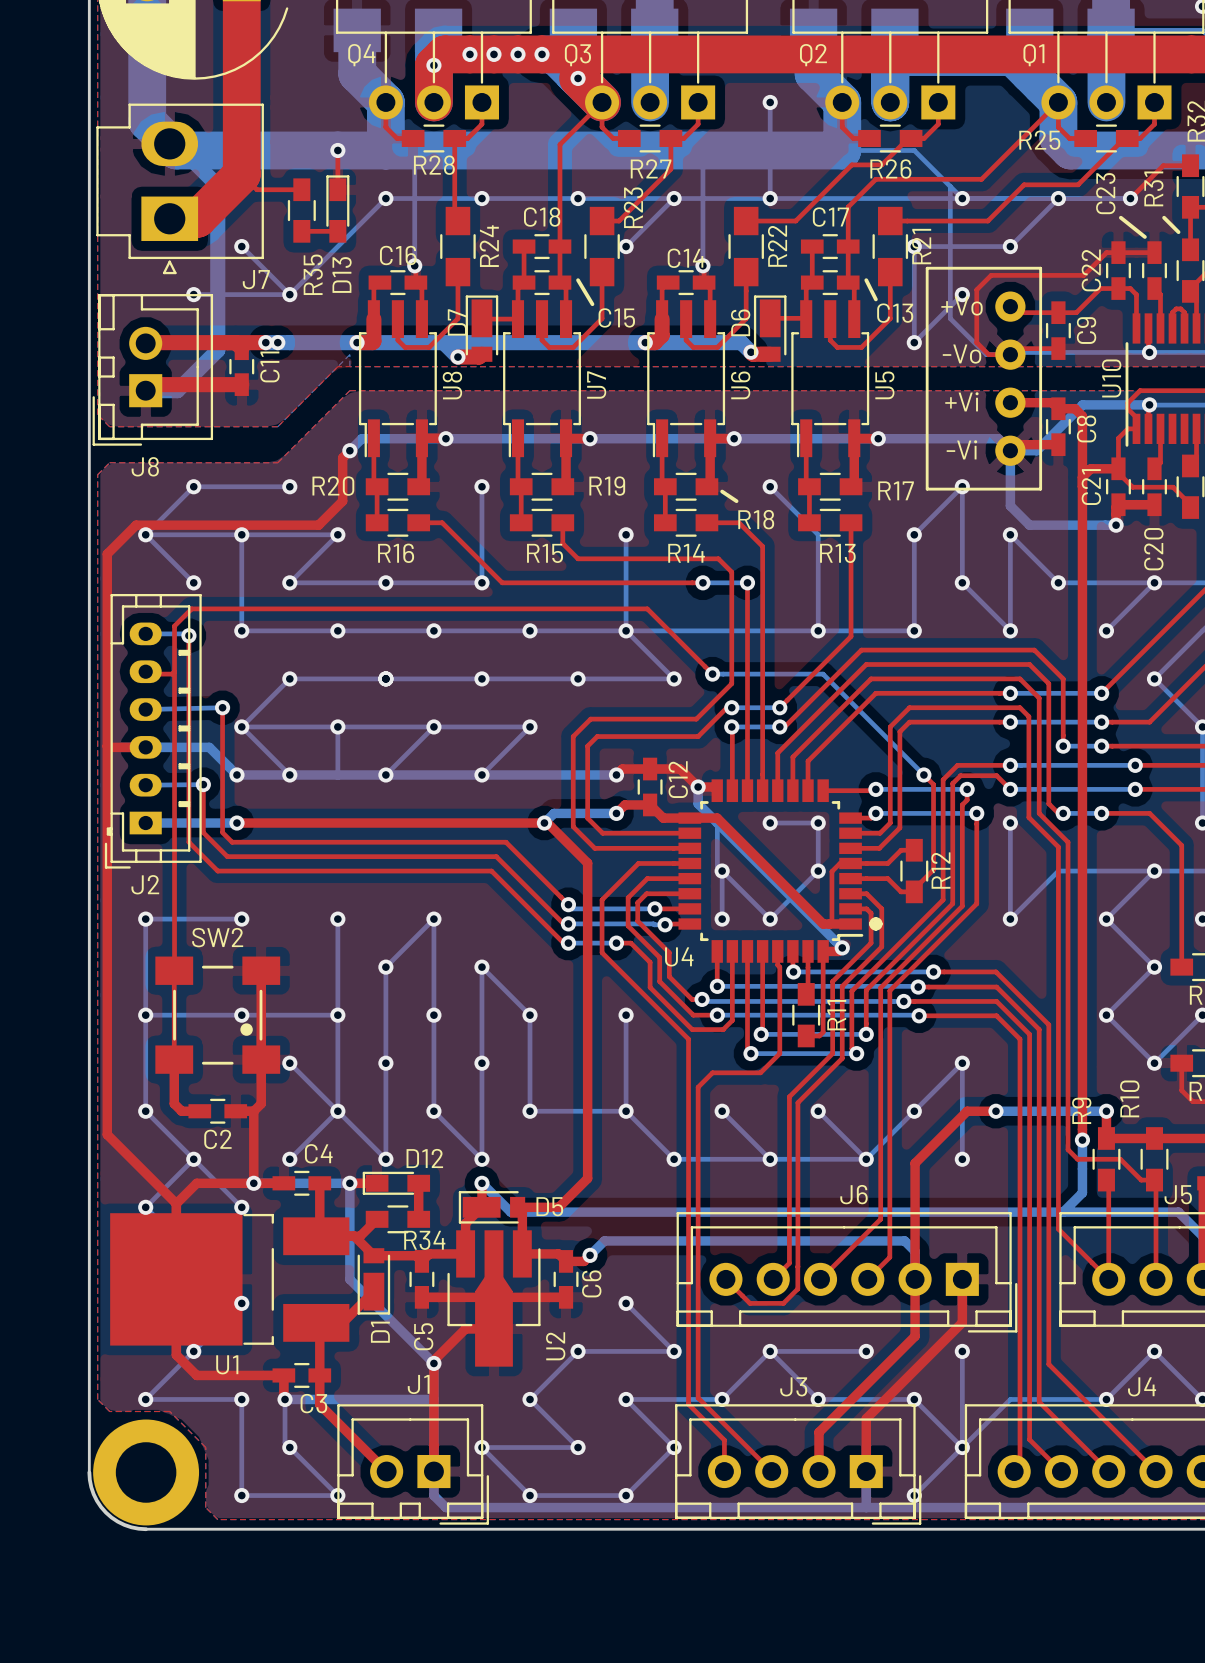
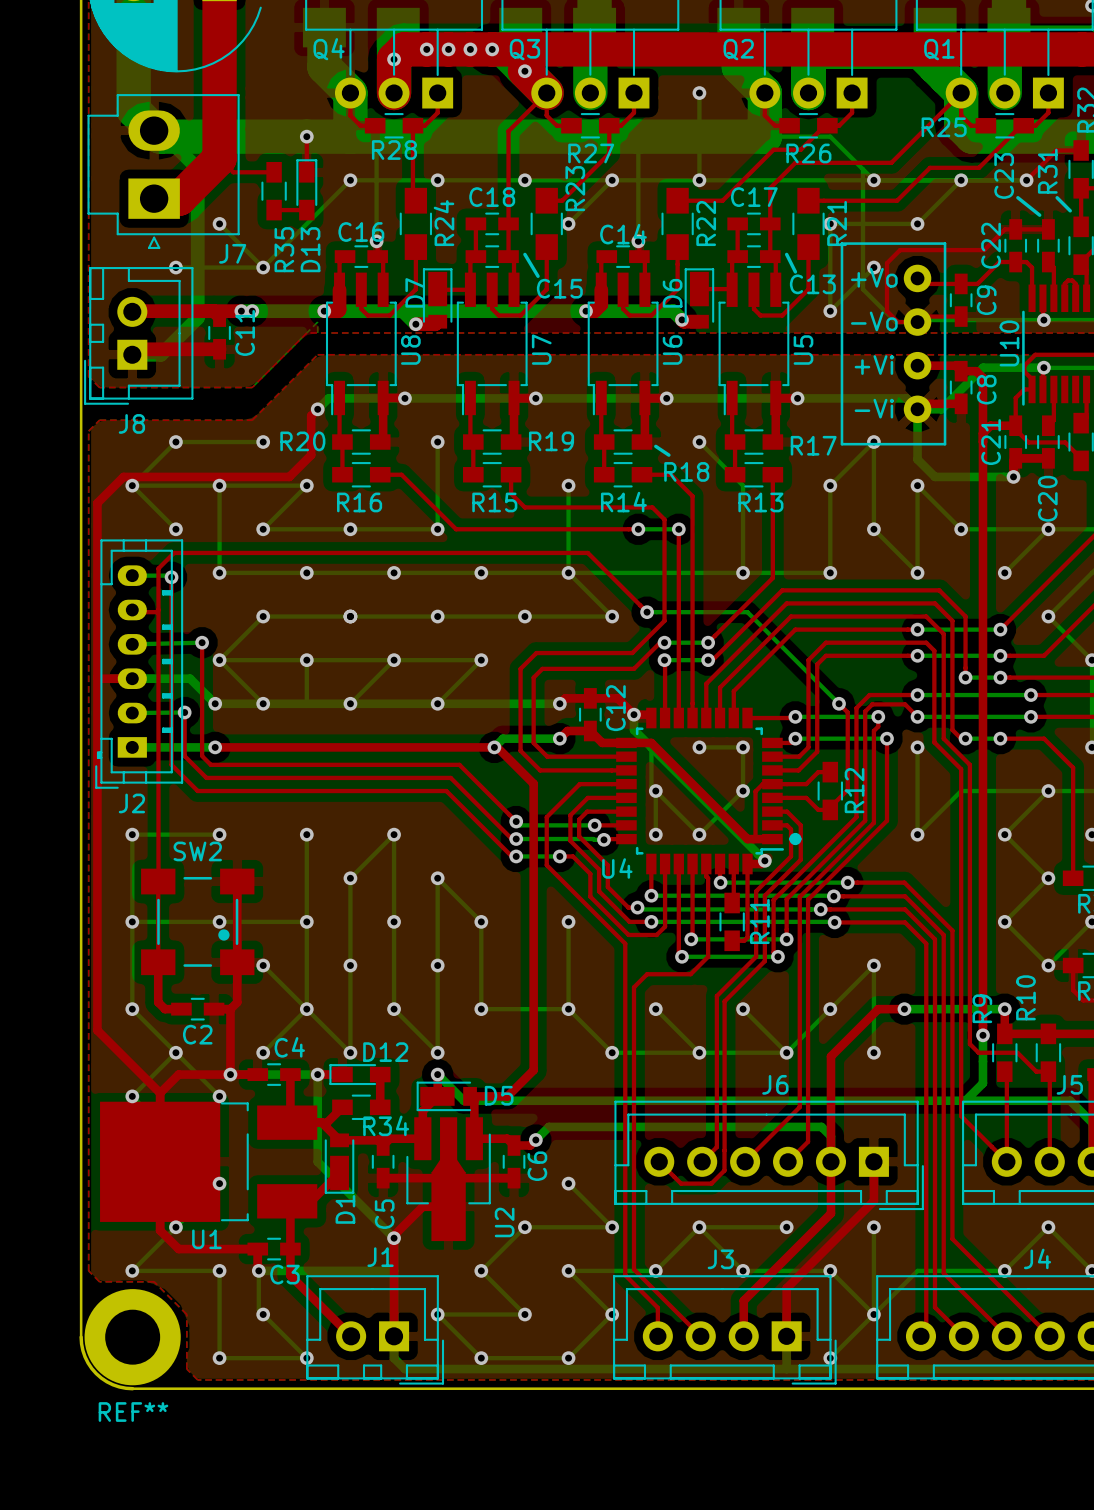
REF** name: none -> REF** (133, 1412)

